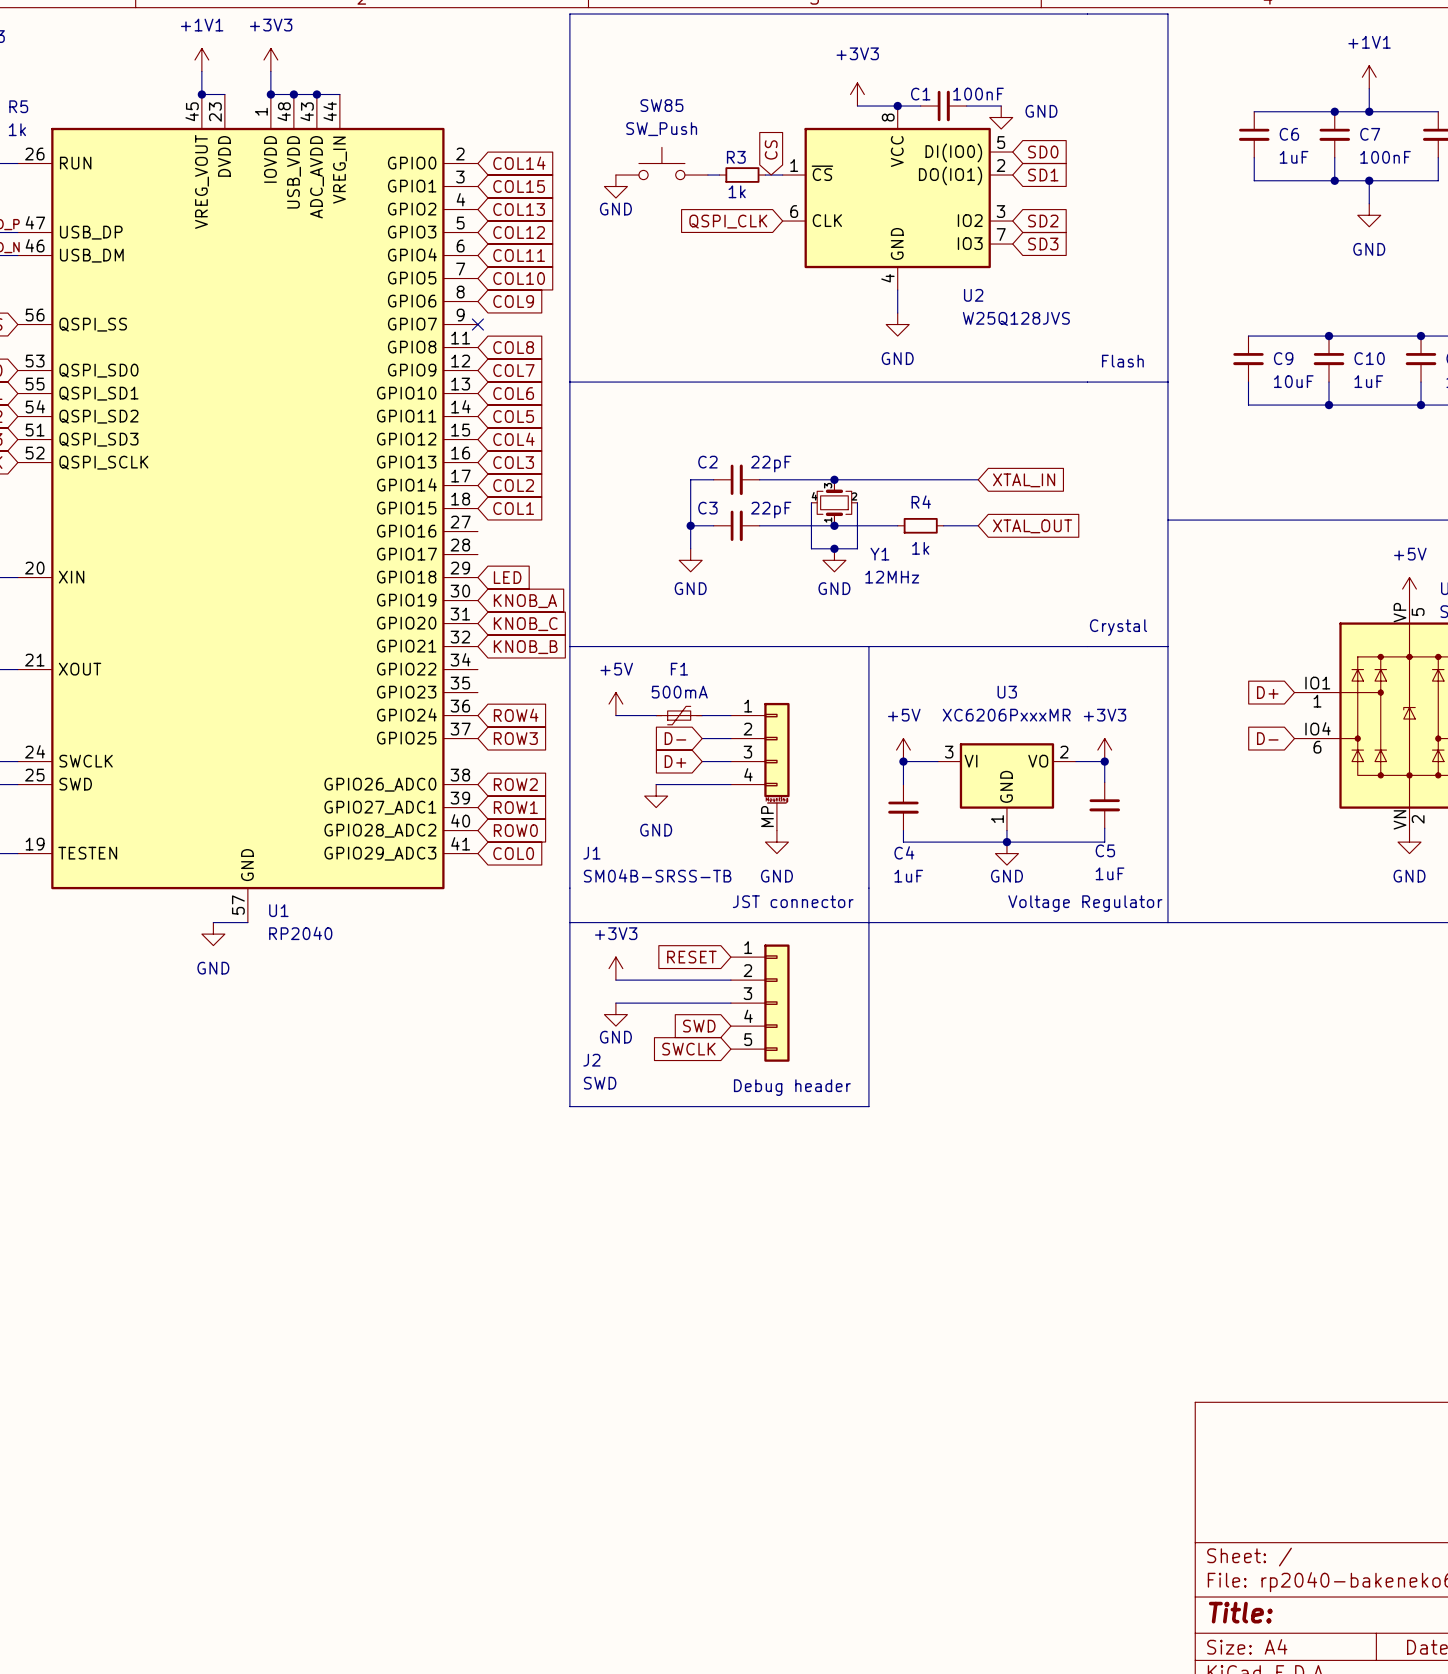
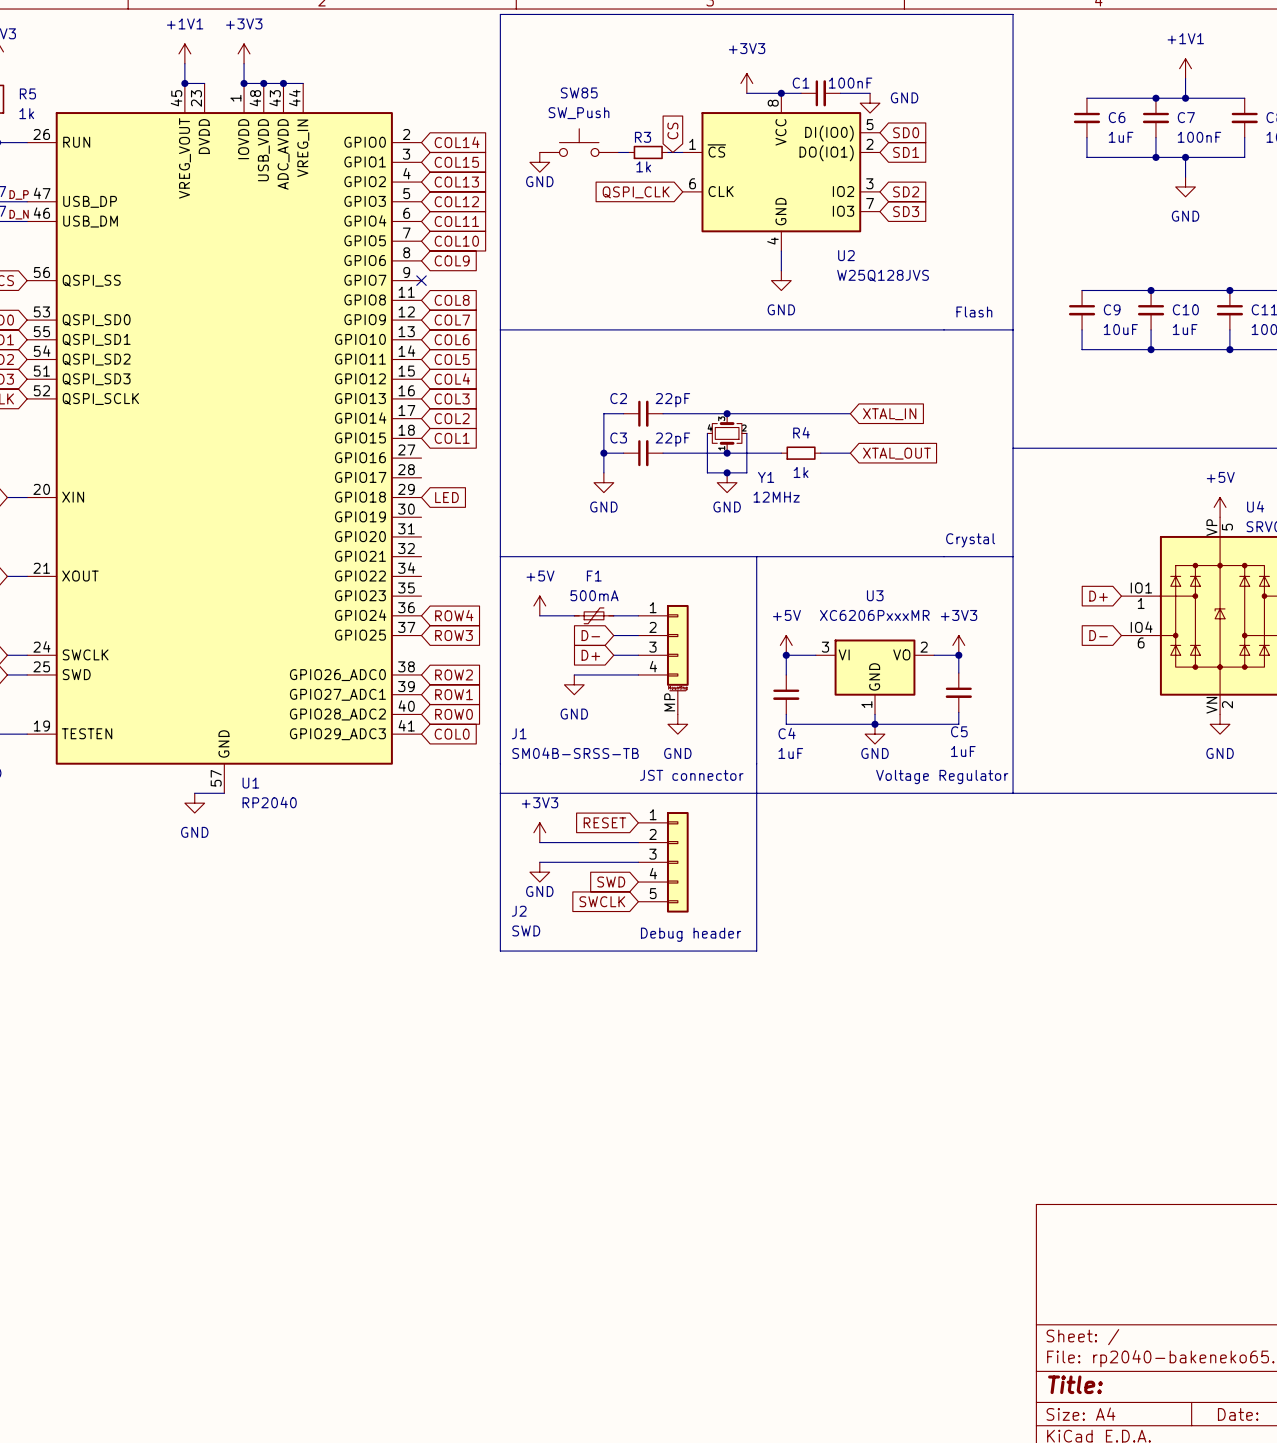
global label: KNOB_A (525, 601) -> none
global label: KNOB_C (525, 624) -> none
global label: KNOB_B (525, 647) -> none

